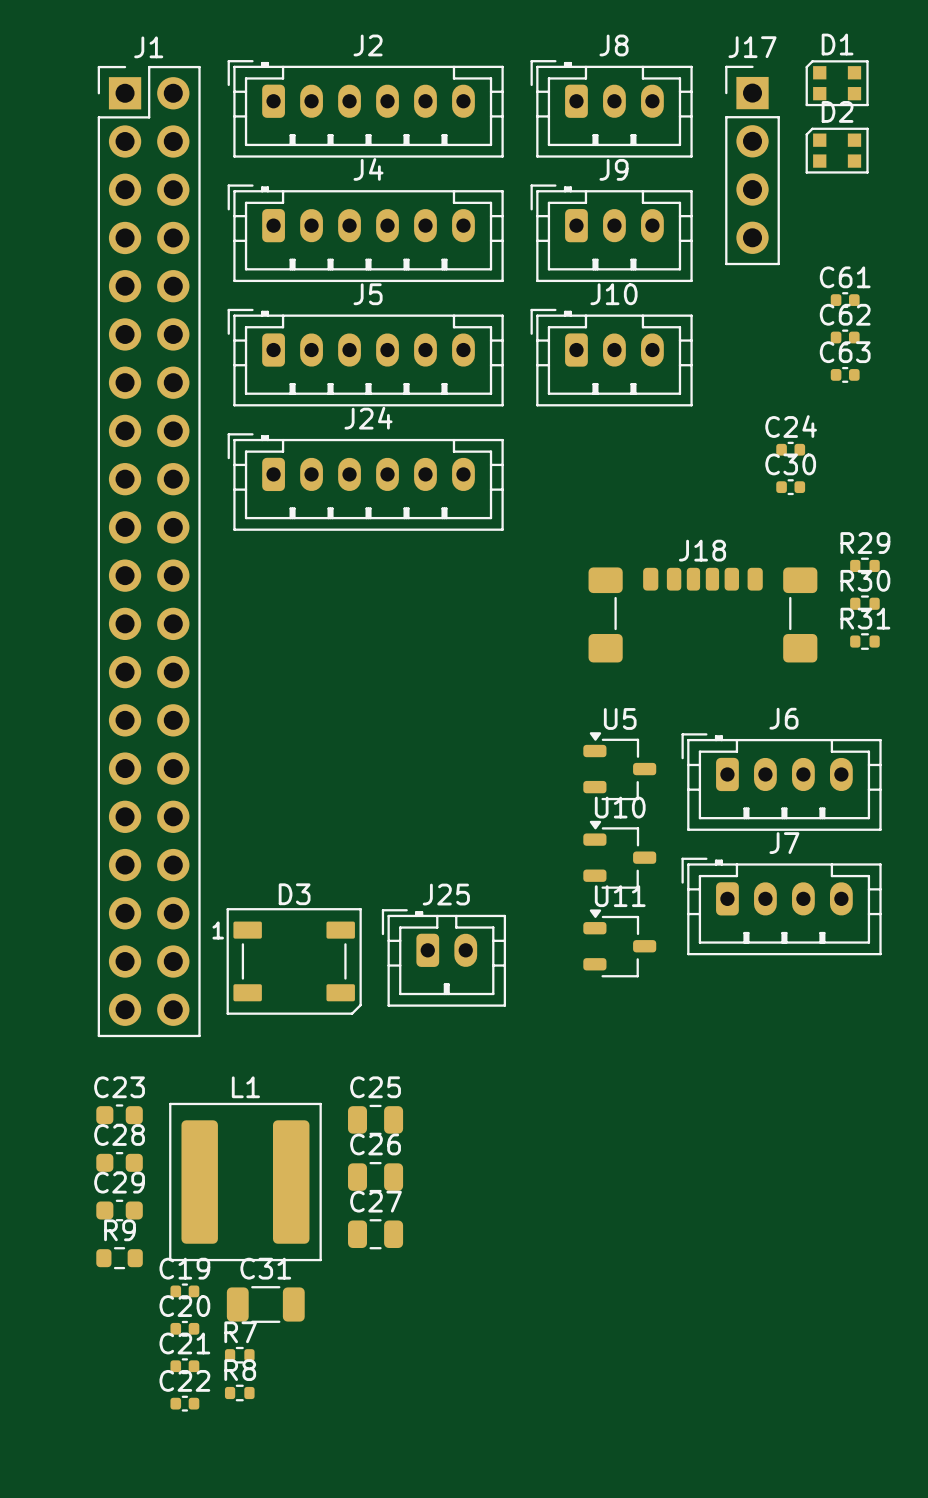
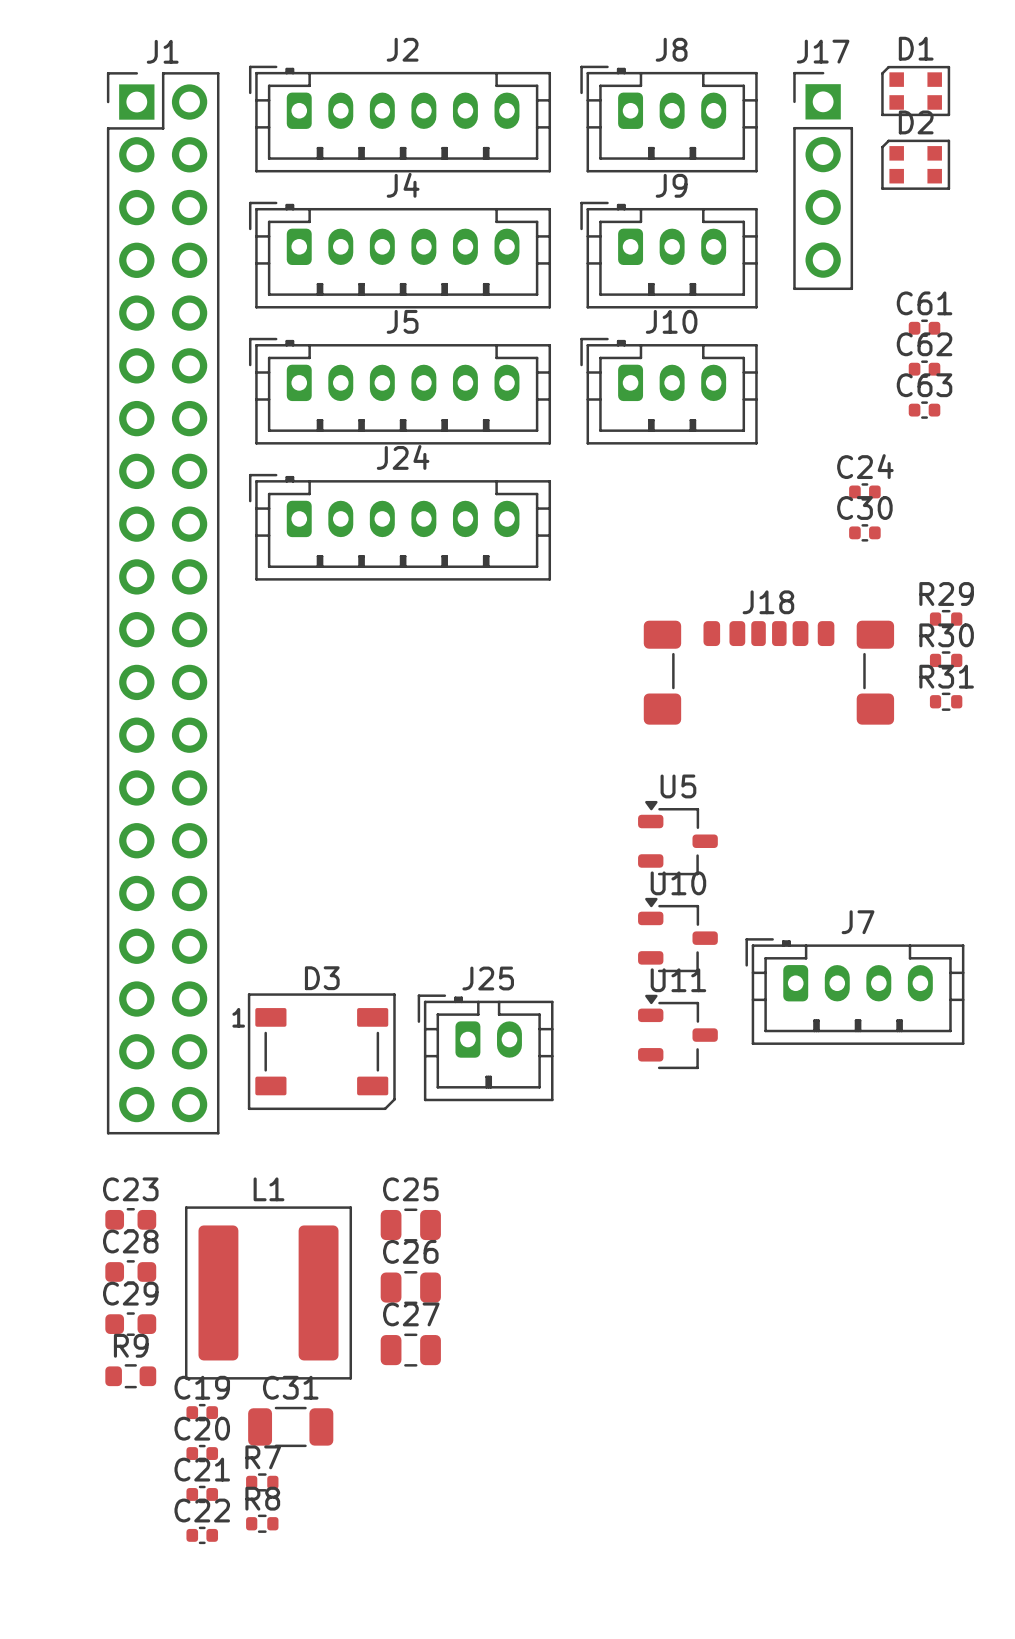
J6: (781, 782) -> none

